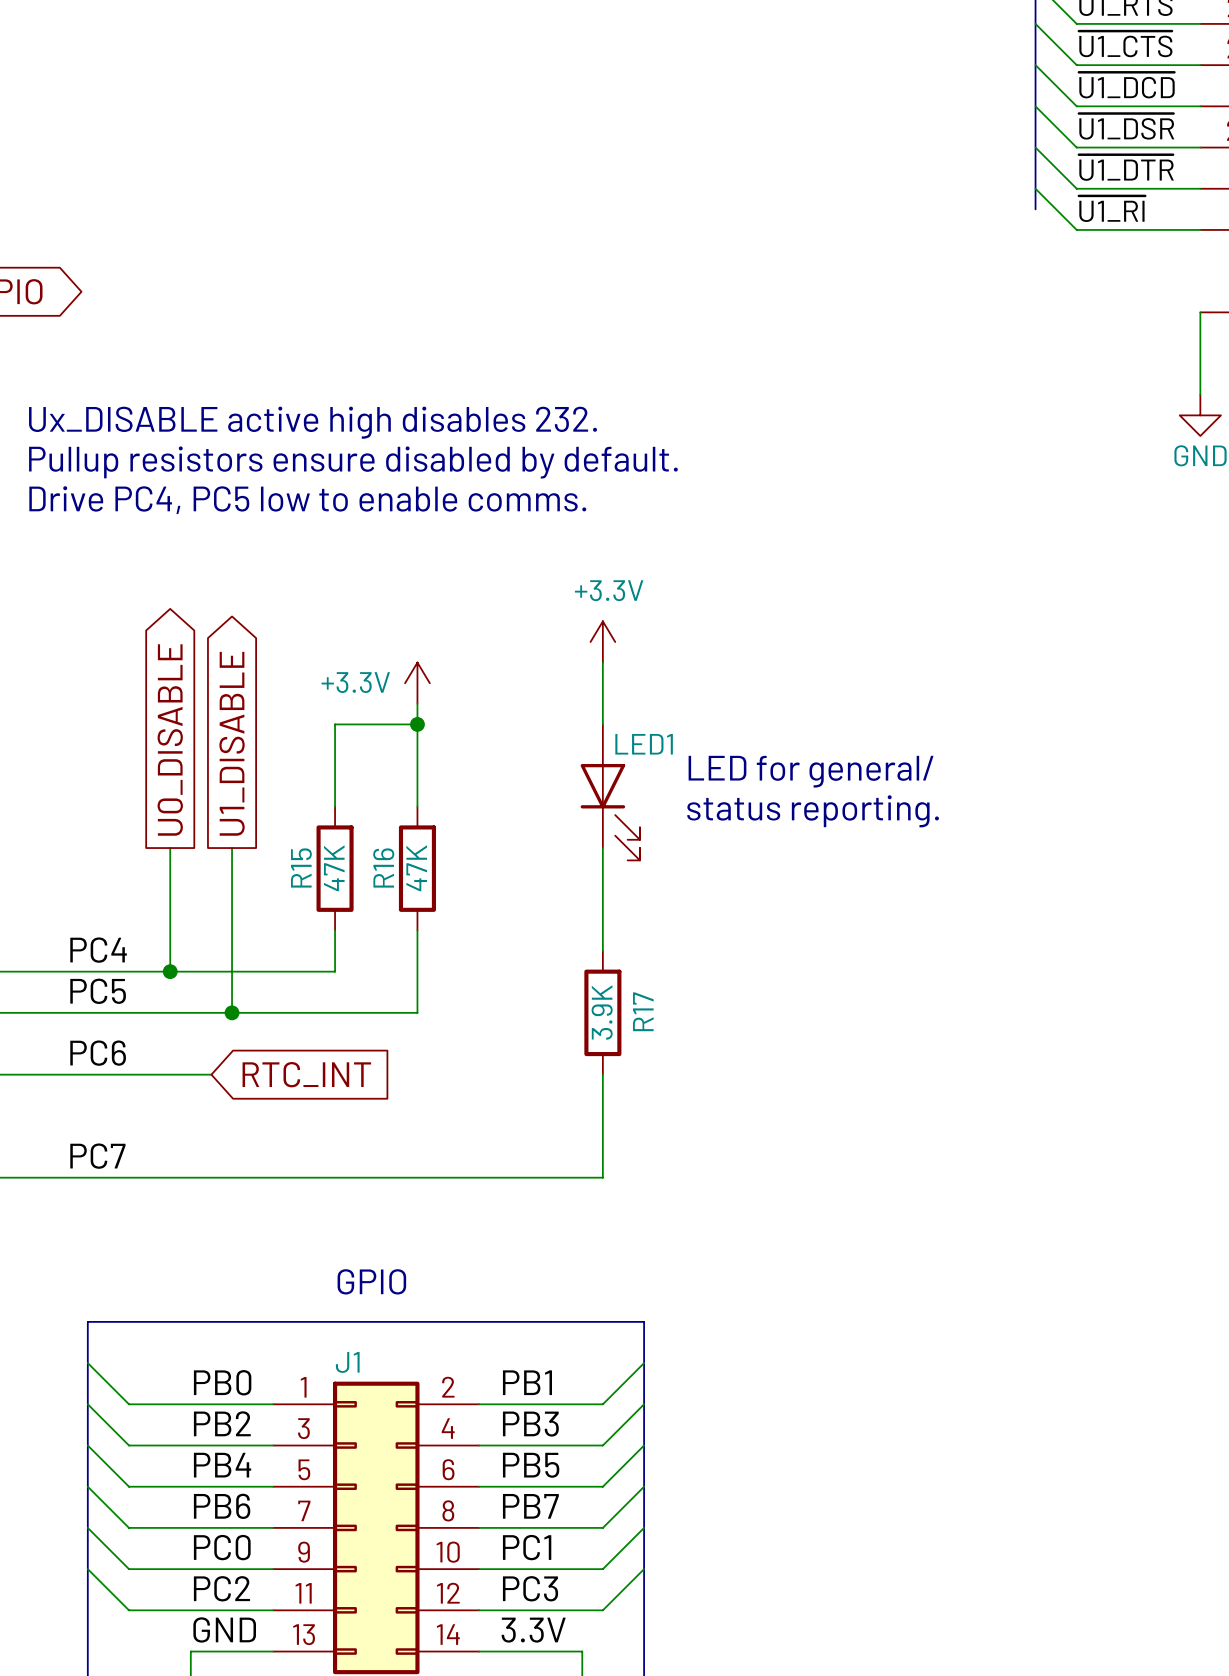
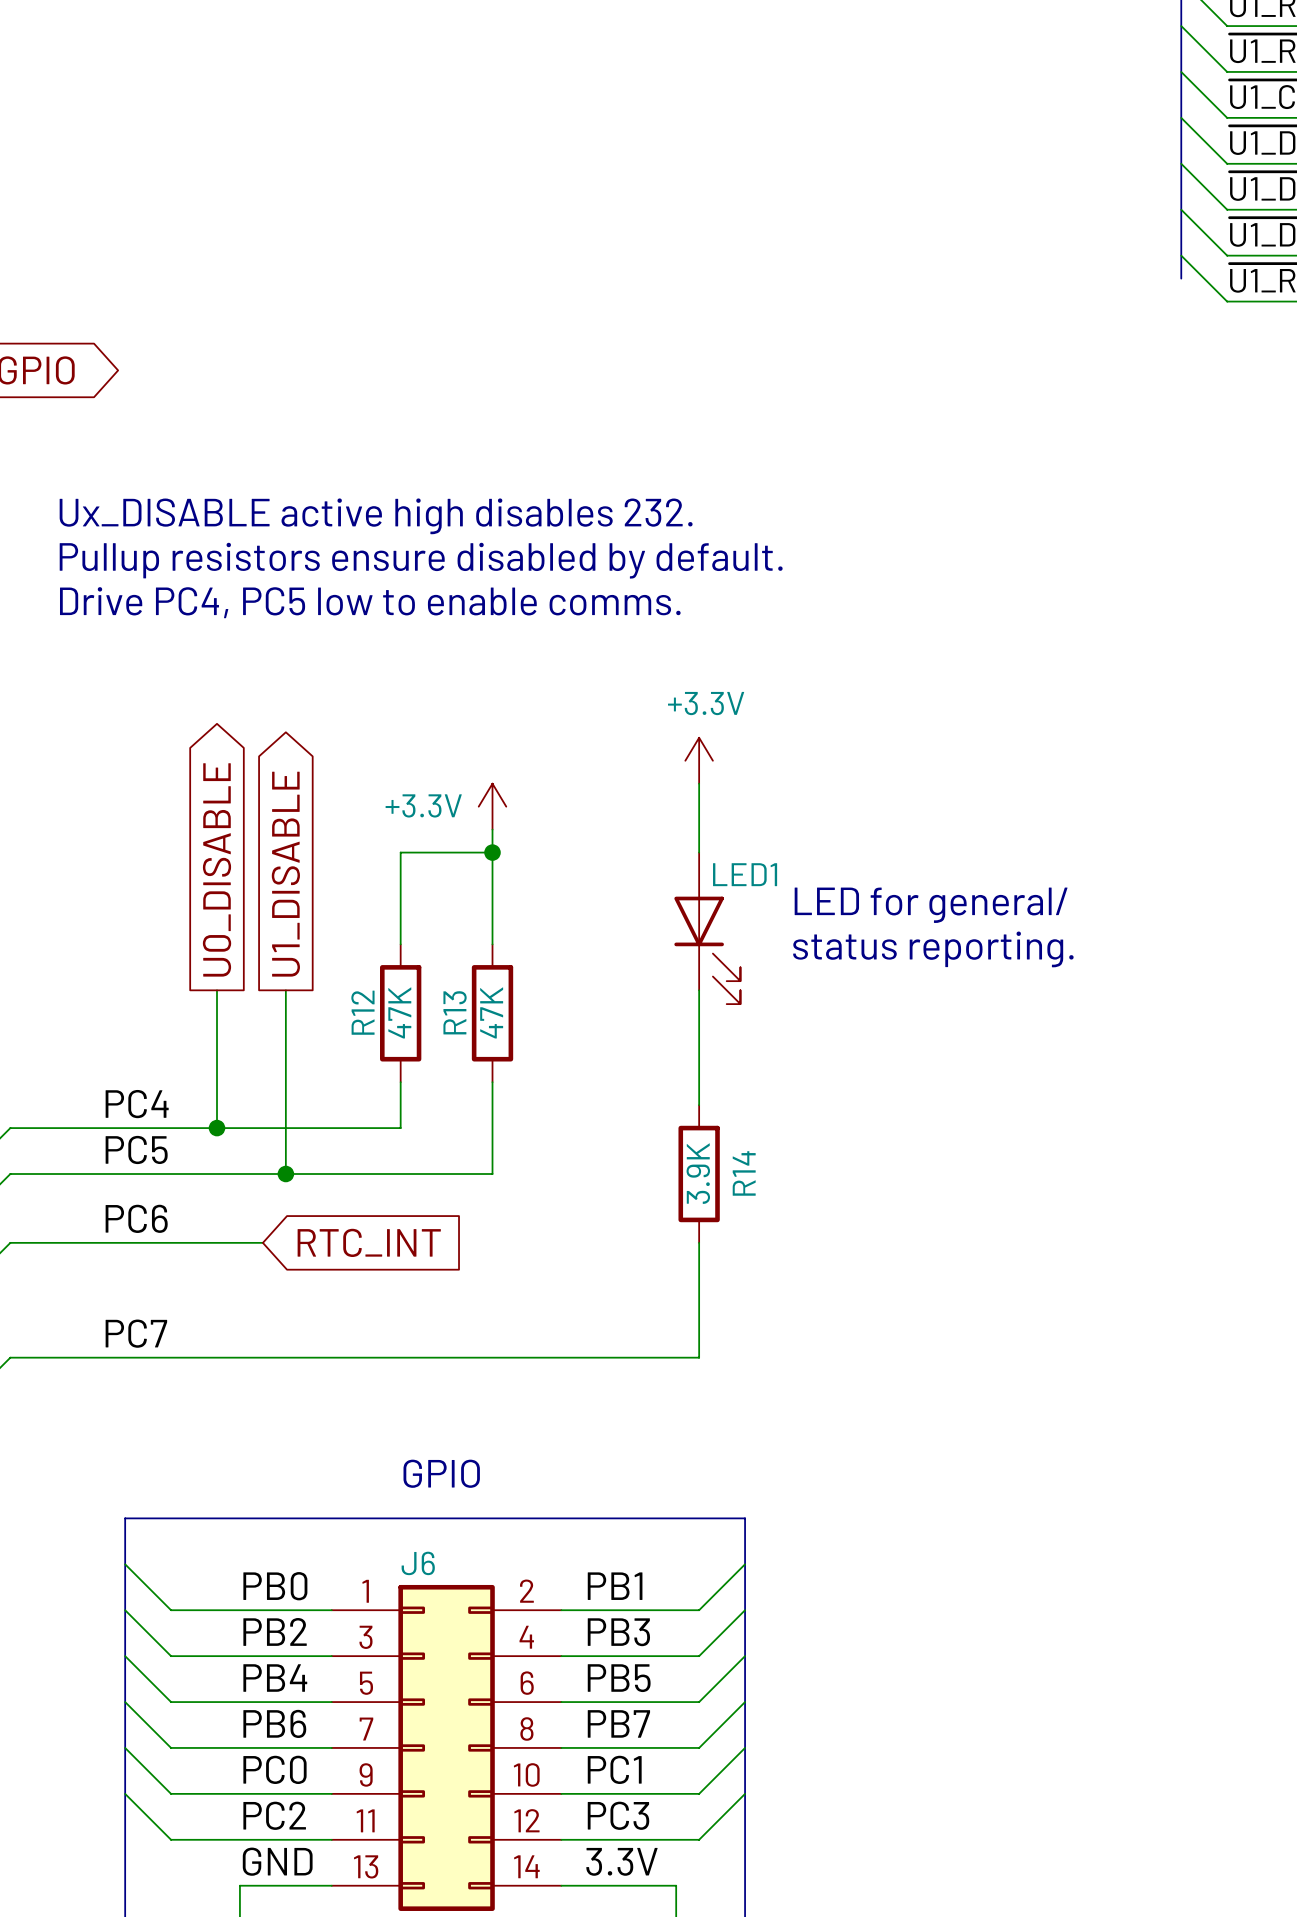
R15 name: R15 (301, 867) -> R12 (362, 1012)
R16 name: R16 (383, 867) -> R13 (455, 1012)
R17 name: R17 (643, 1011) -> R14 (744, 1173)
J1 name: J1 (347, 1362) -> J6 (418, 1563)

